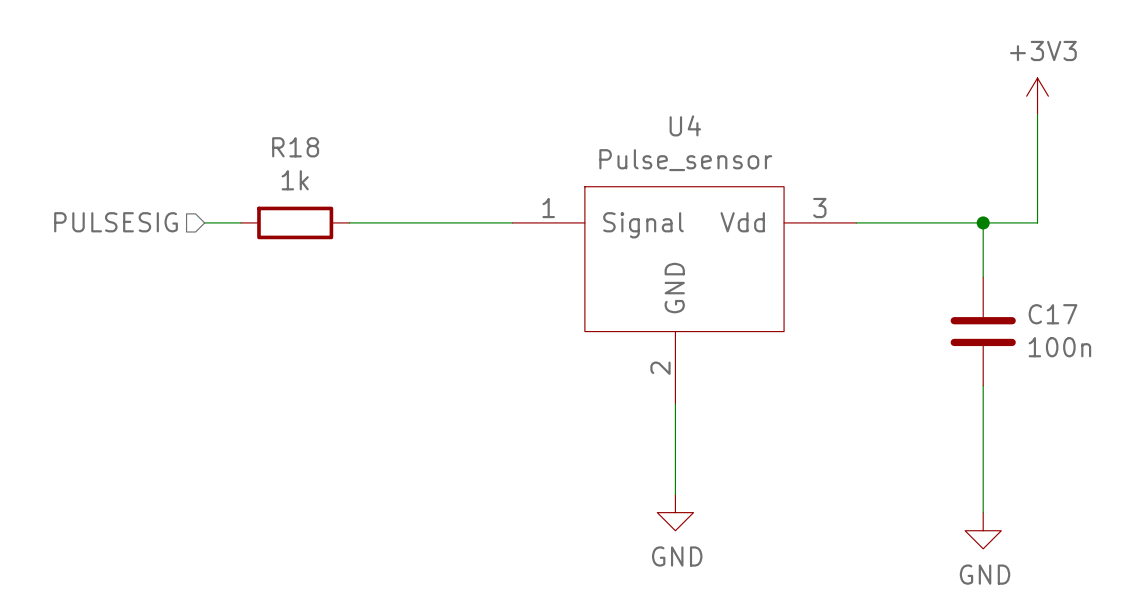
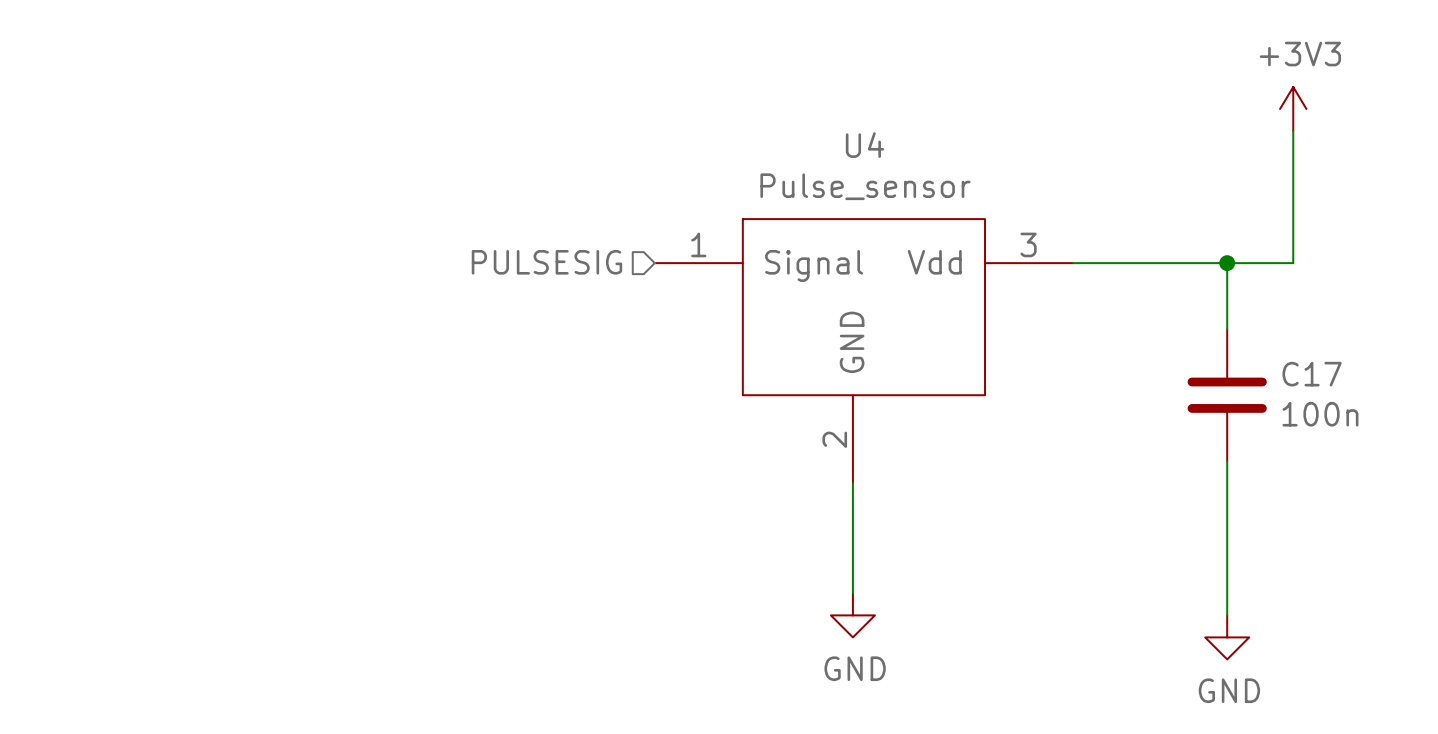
hierarchical label position: PULSESIG (116, 222) -> PULSESIG (546, 262)
wire: (204, 222) (240, 222) -> none
R18: 1k (295, 222) -> none
wire: (349, 222) (512, 222) -> none

